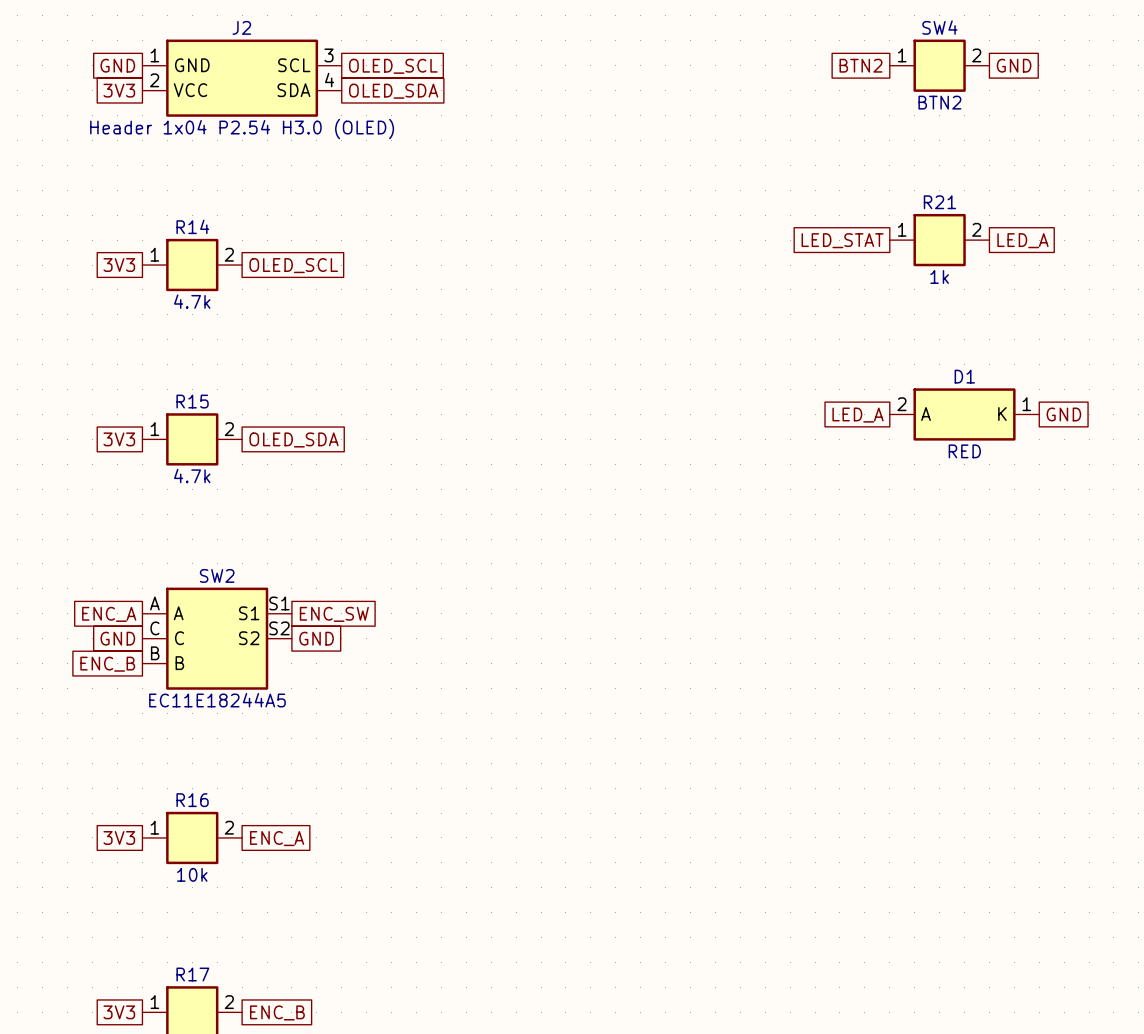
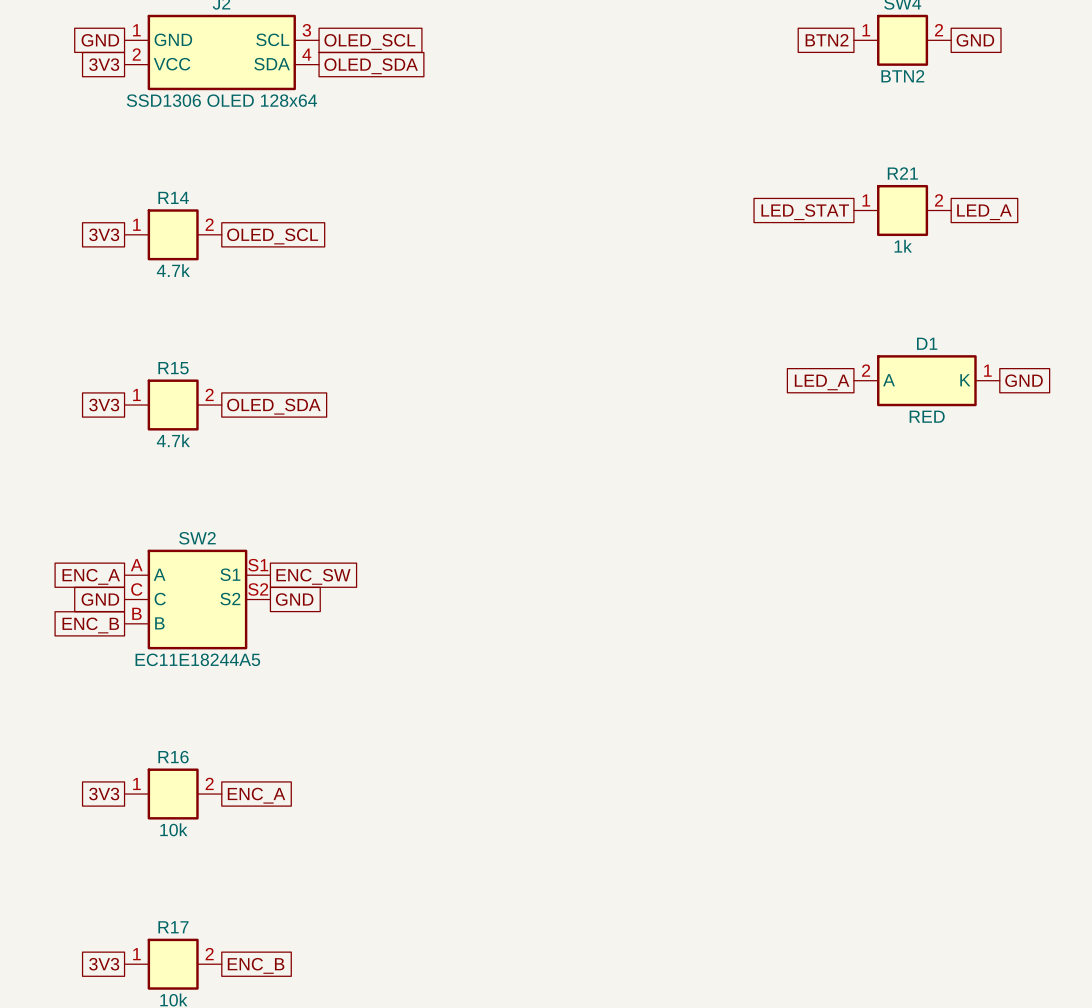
J2 value: Header 1x04 P2.54 H3.0 (OLED) (242, 129) -> SSD1306 OLED 128x64 (221, 100)

